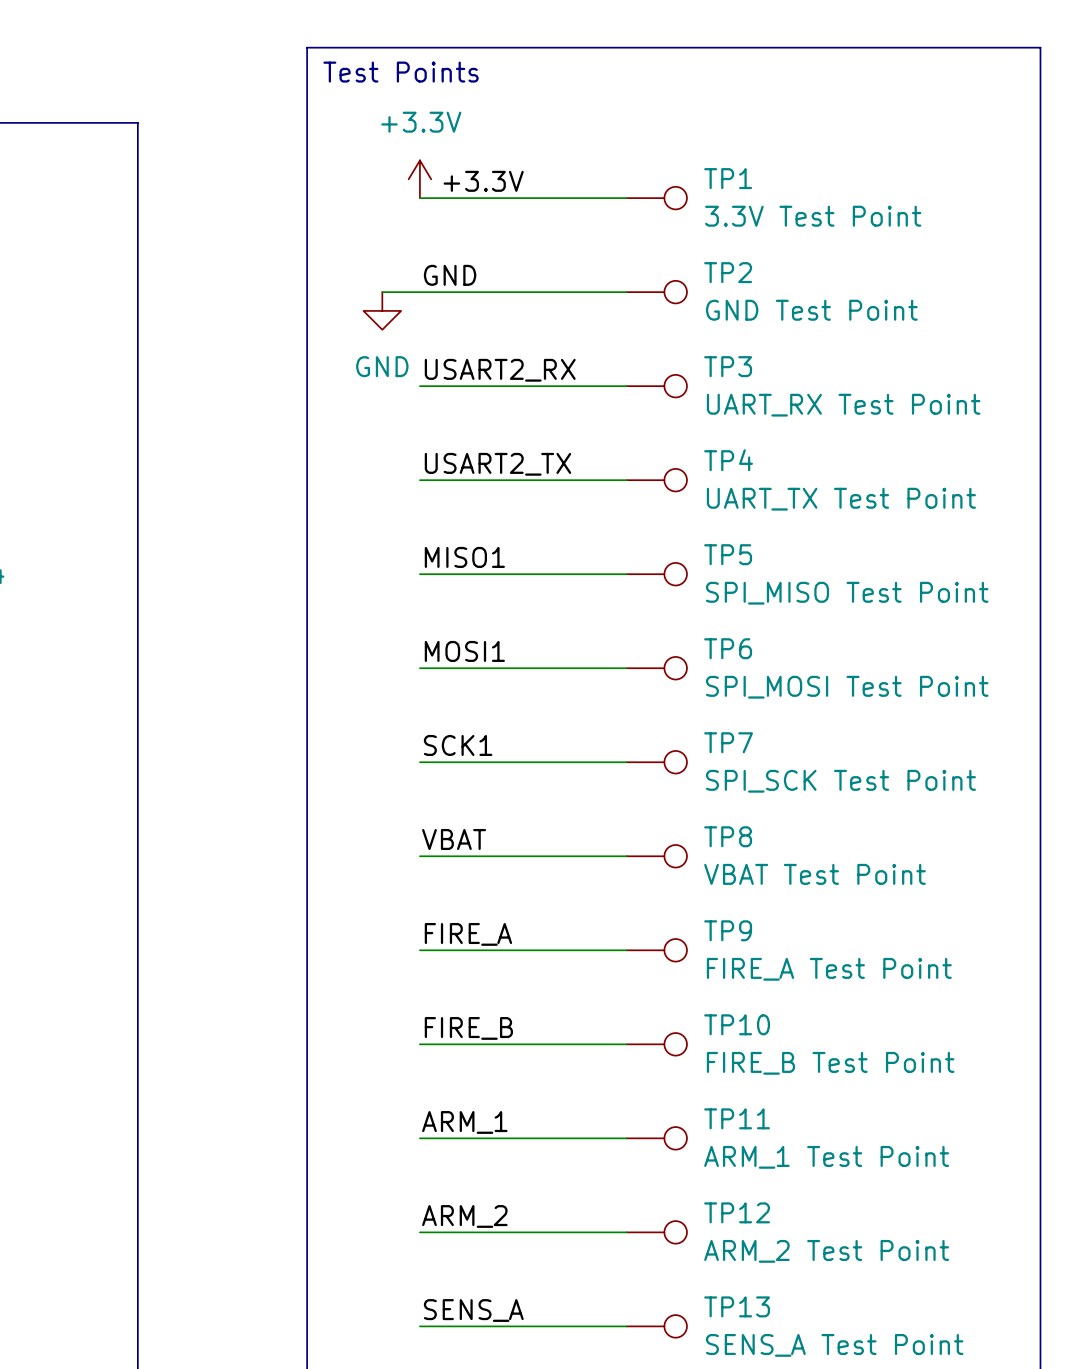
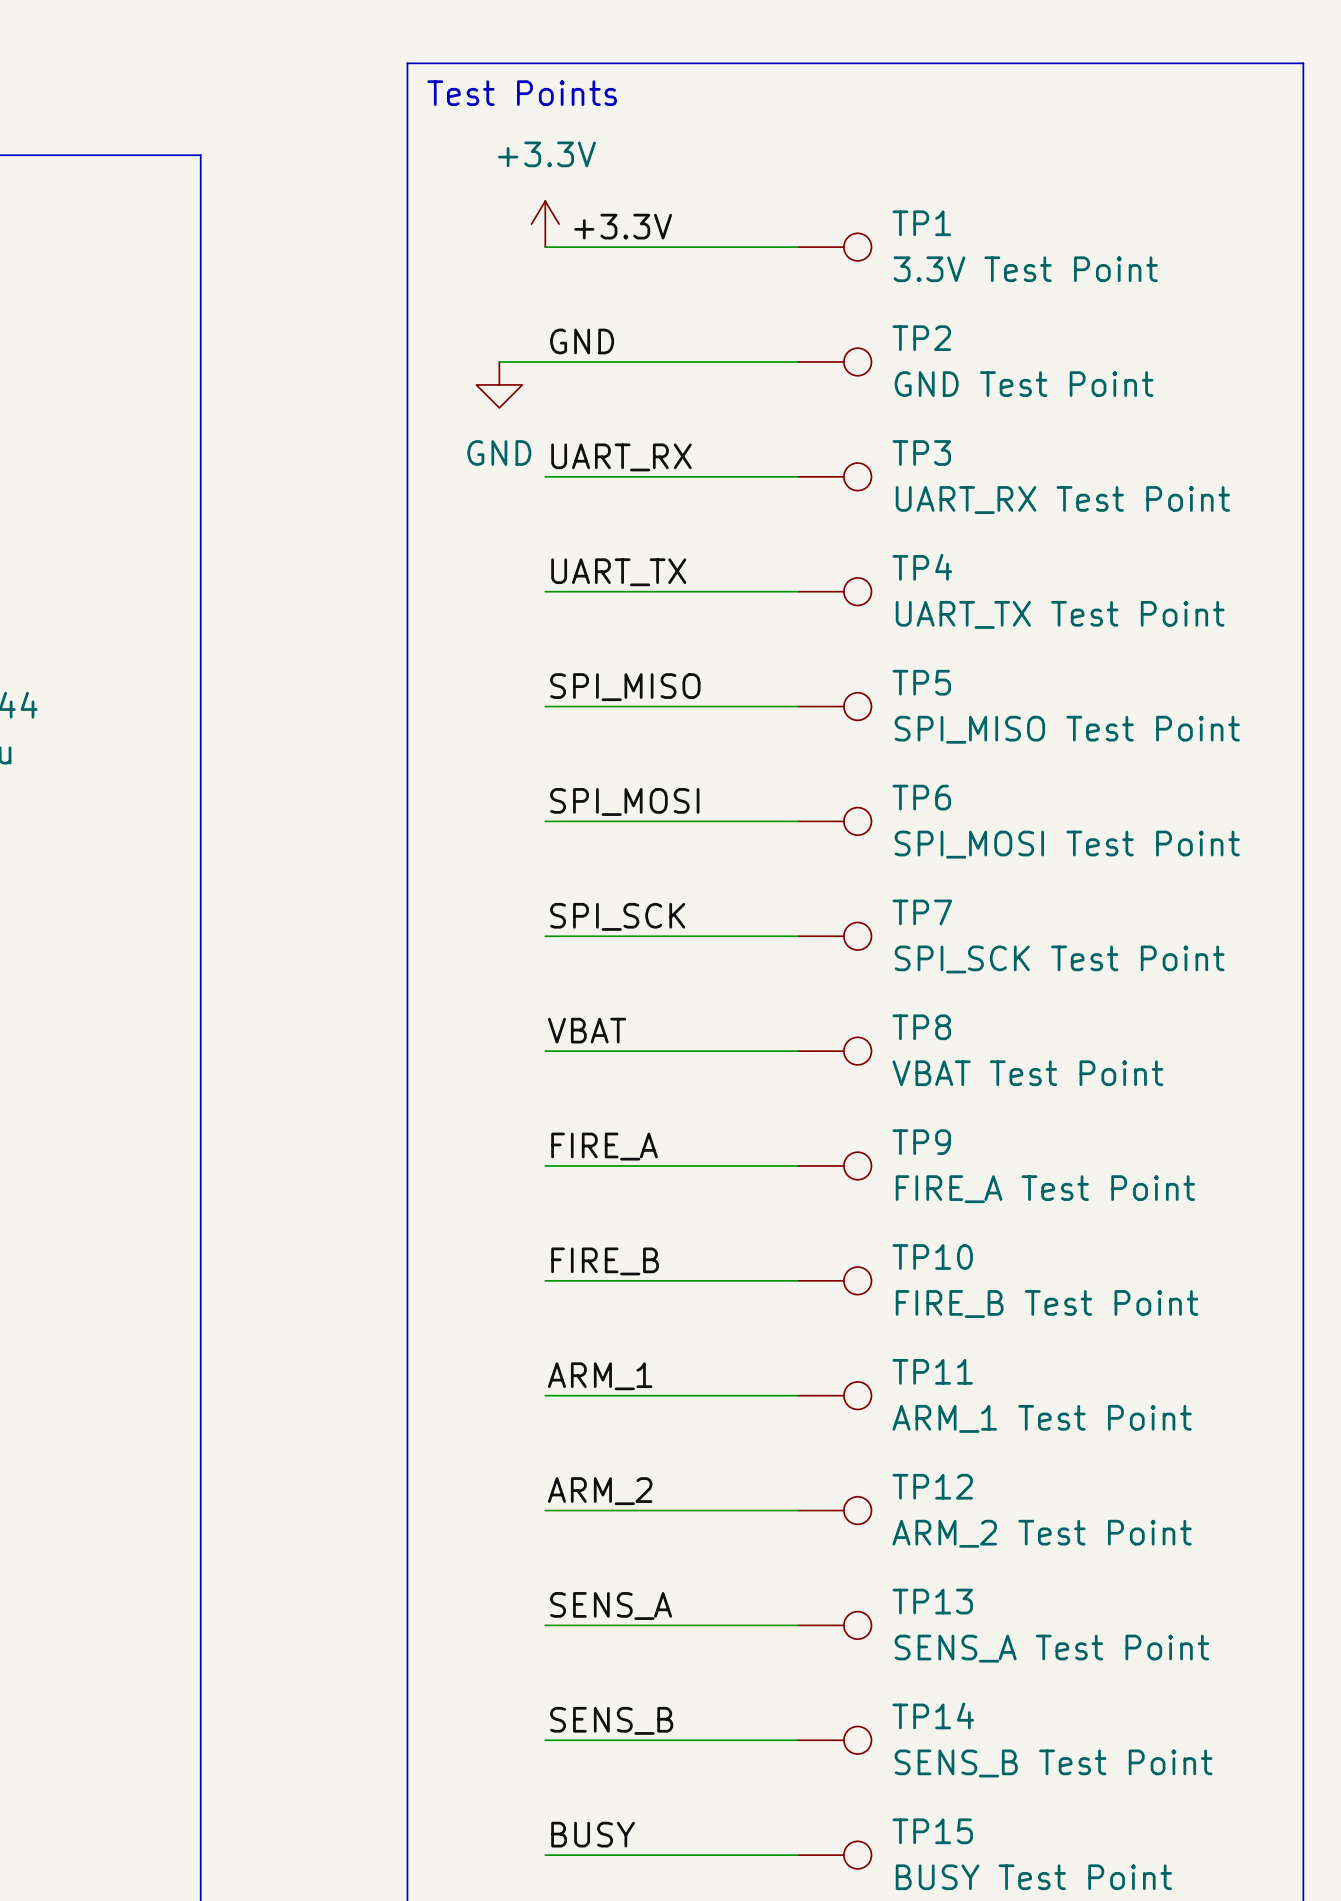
label: USART2_RX (500, 370) -> UART_RX (621, 457)
label: USART2_TX (497, 464) -> UART_TX (618, 572)
label: MISO1 (464, 557) -> SPI_MISO (625, 687)
label: MOSI1 (464, 651) -> SPI_MOSI (624, 802)
label: SCK1 (458, 745) -> SPI_SCK (617, 916)

